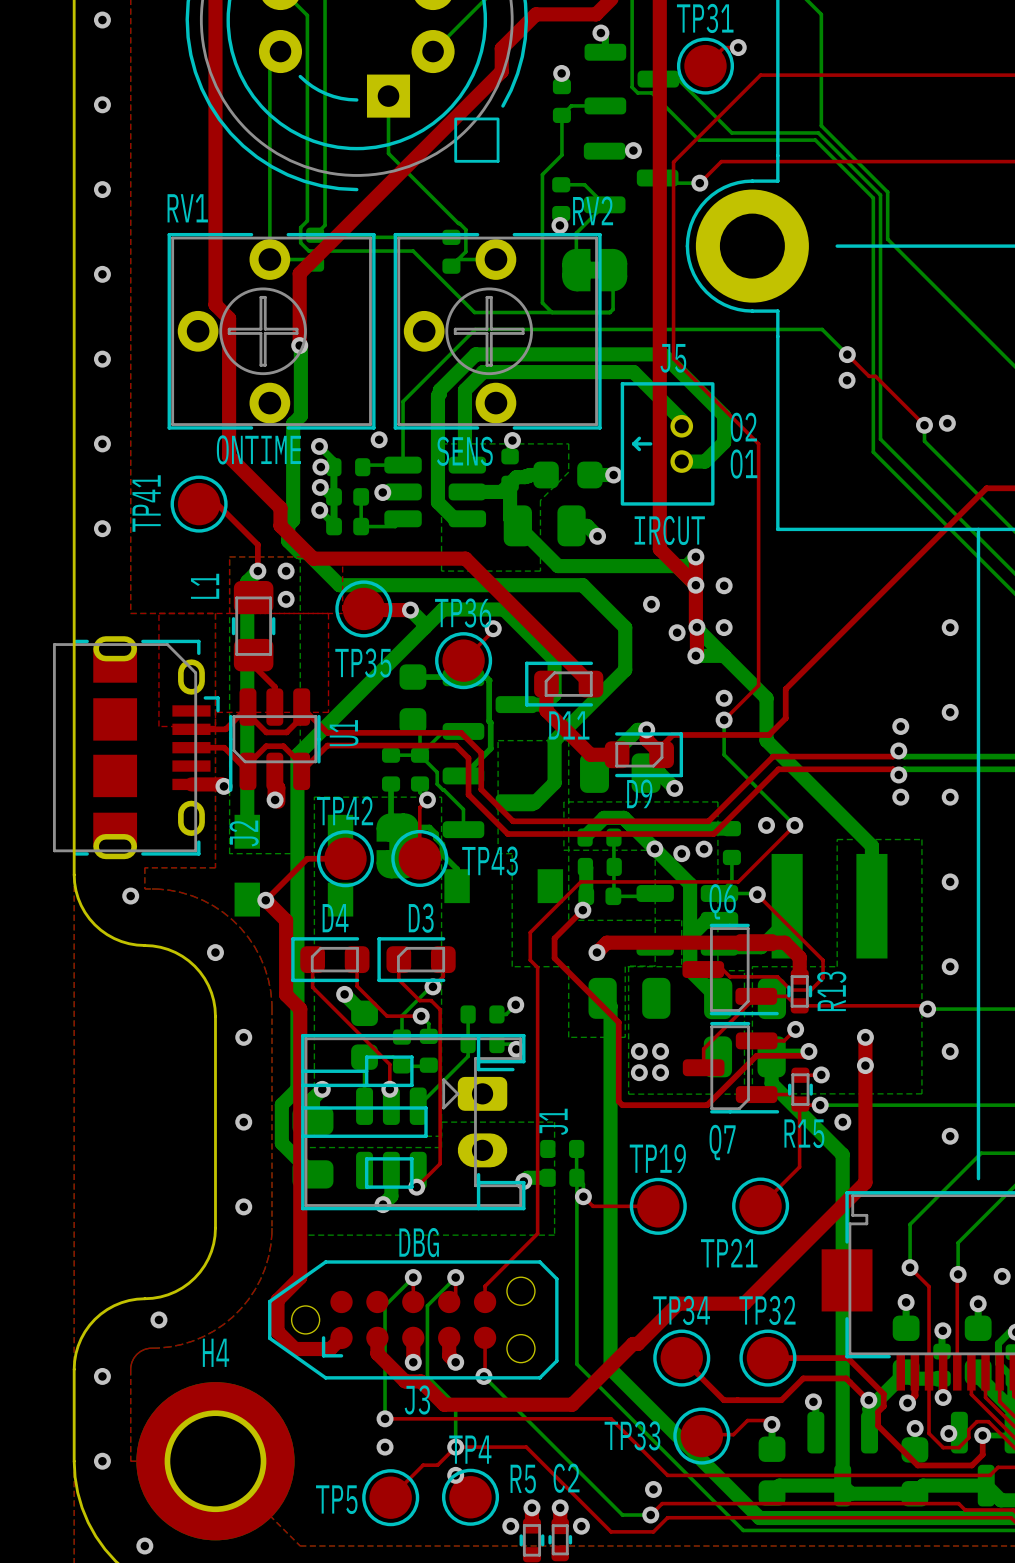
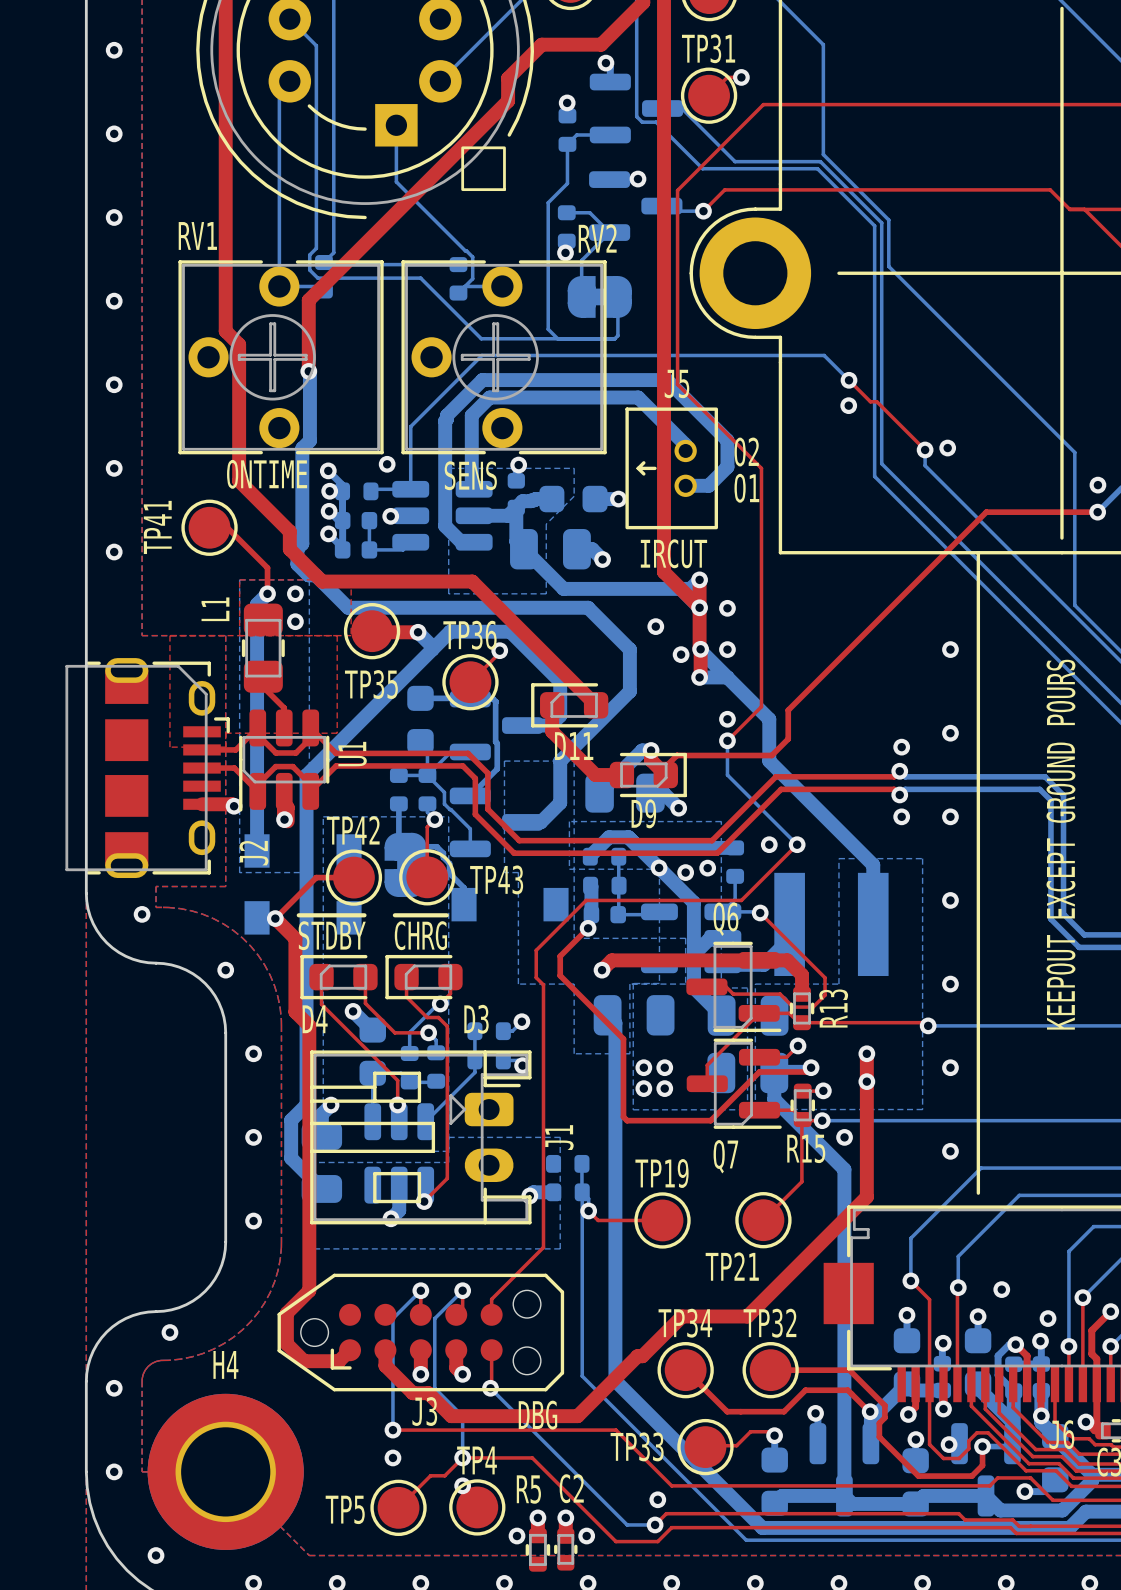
text: none -> ~{STDBY} (332, 932)
text: none -> ~{CHRG} (420, 932)
D4 name position: D4 (335, 918) -> D4 (315, 1019)
D3 name position: D3 (421, 918) -> D3 (476, 1019)
text position: DBG (419, 1242) -> DBG (537, 1415)

